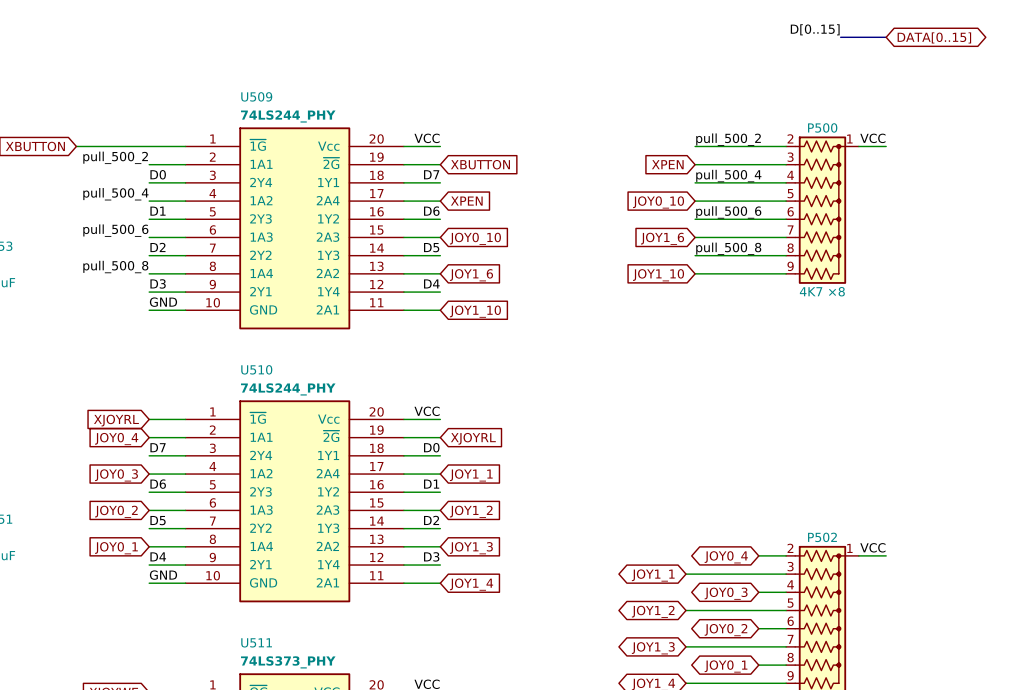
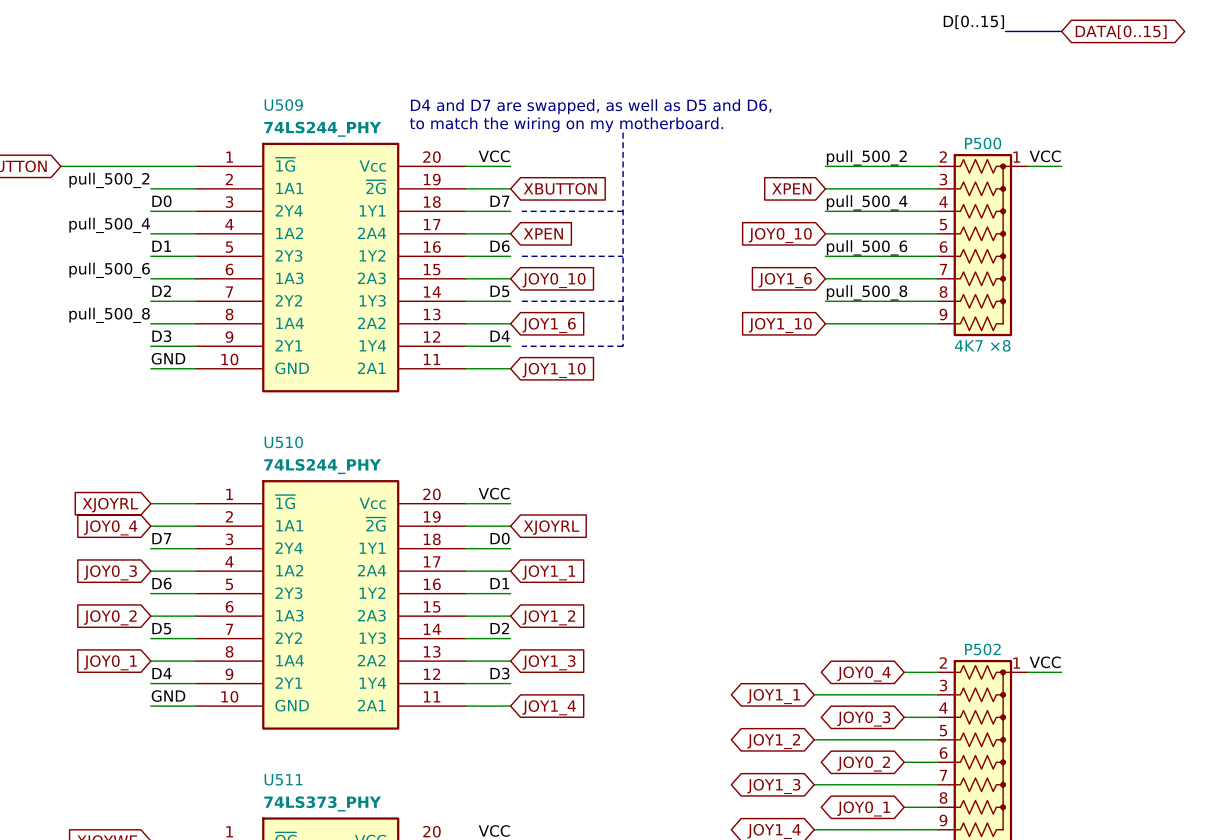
text: none -> D4 and D7 are swapped, as well as D5 and D6, (591, 106)
text: none -> to match the wiring on my motherboard. (566, 124)
line: none -> (623, 132) (623, 346) (521, 346)
line: none -> (521, 211) (623, 211)
line: none -> (521, 256) (623, 256)
line: none -> (521, 301) (623, 301)

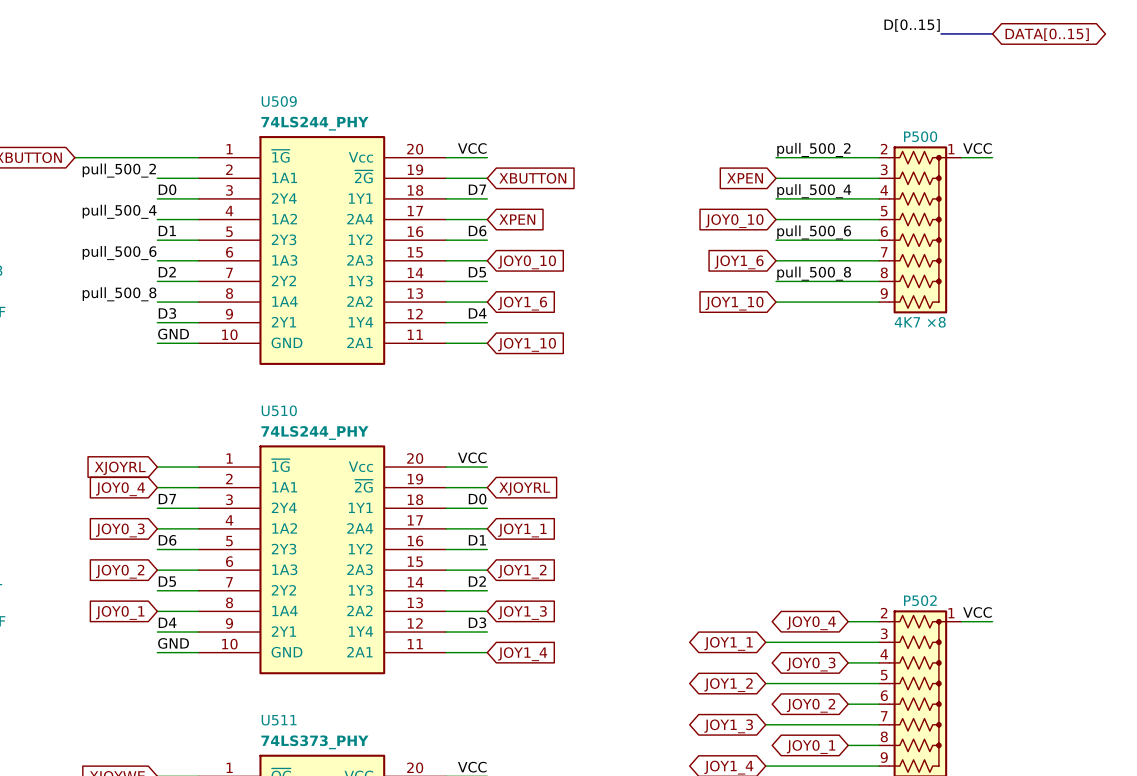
text: D4 and D7 are swapped, as well as D5 and D6, (591, 106) -> none
text: to match the wiring on my motherboard. (566, 124) -> none
line: (623, 132) (623, 346) (521, 346) -> none
line: (521, 211) (623, 211) -> none
line: (521, 256) (623, 256) -> none
line: (521, 301) (623, 301) -> none

